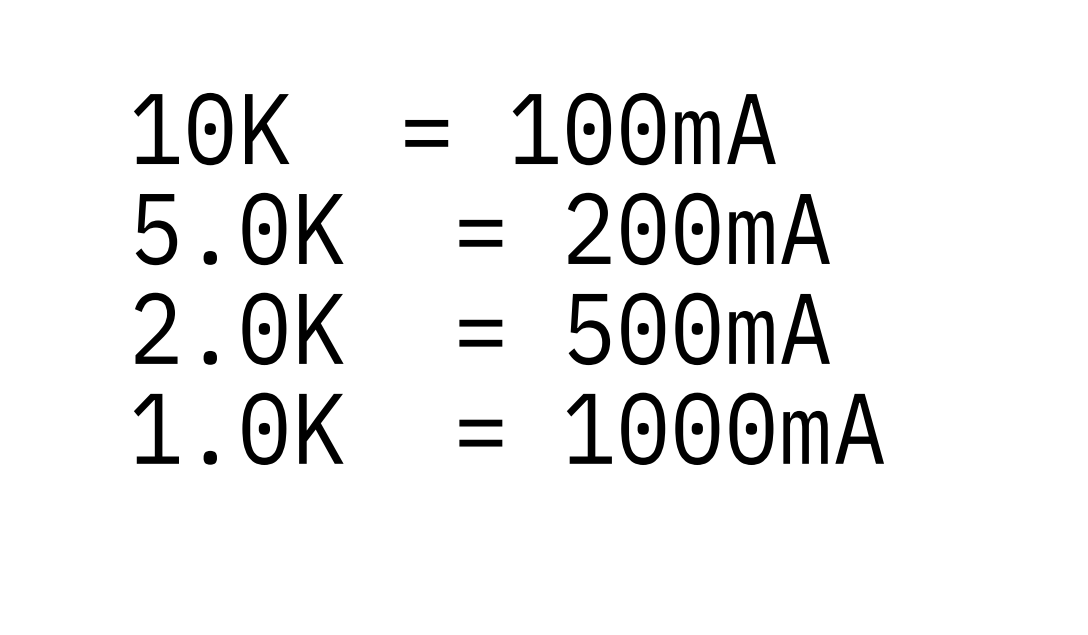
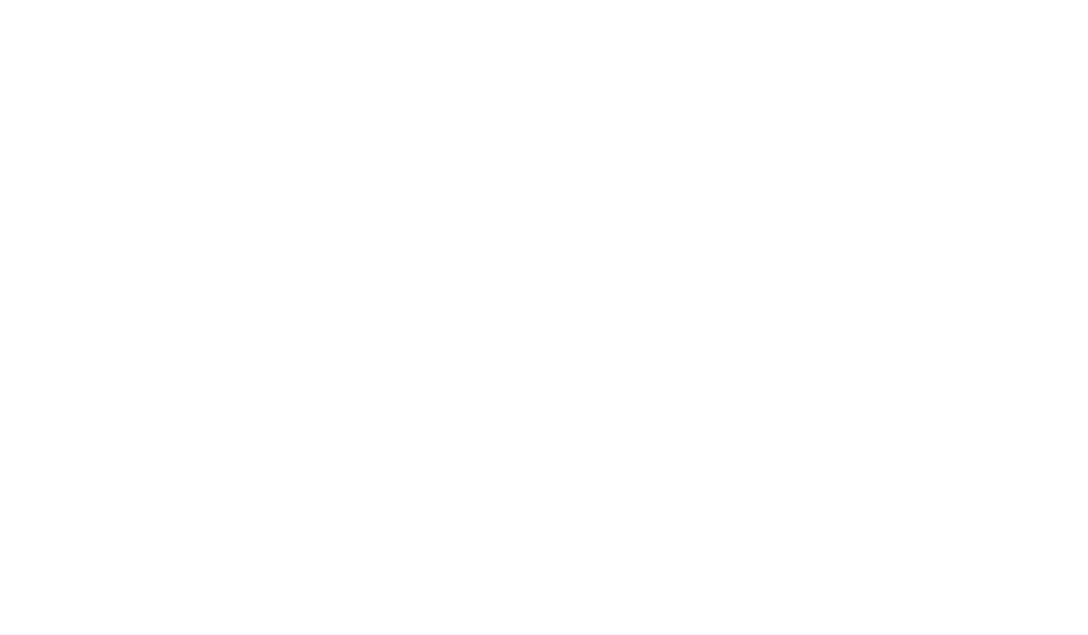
text: 10K = 100mA (454, 129) -> none
text: 5.0K = 200mA (482, 228) -> none
text: 2.0K = 500mA (482, 328) -> none
text: 1.0K = 1000mA (508, 428) -> none

